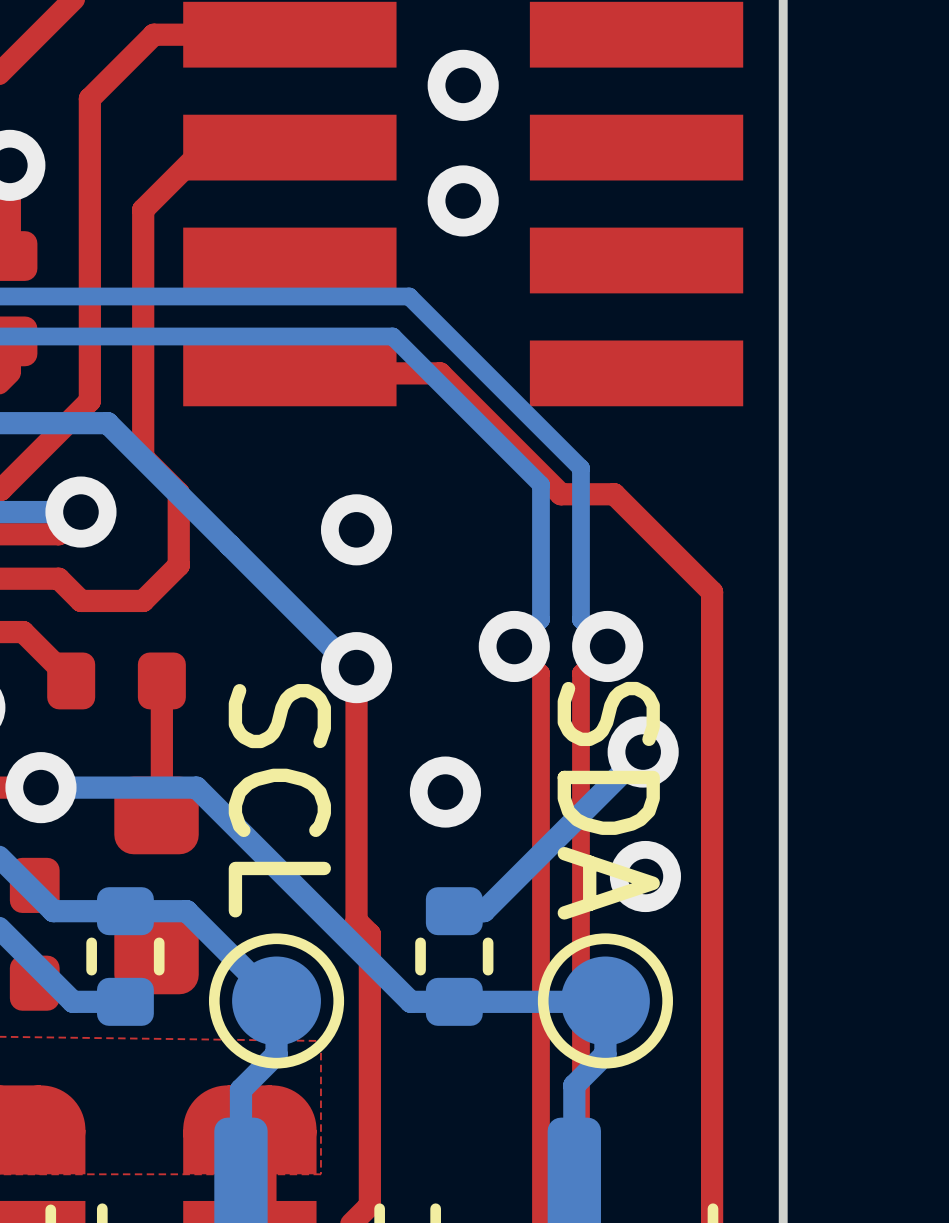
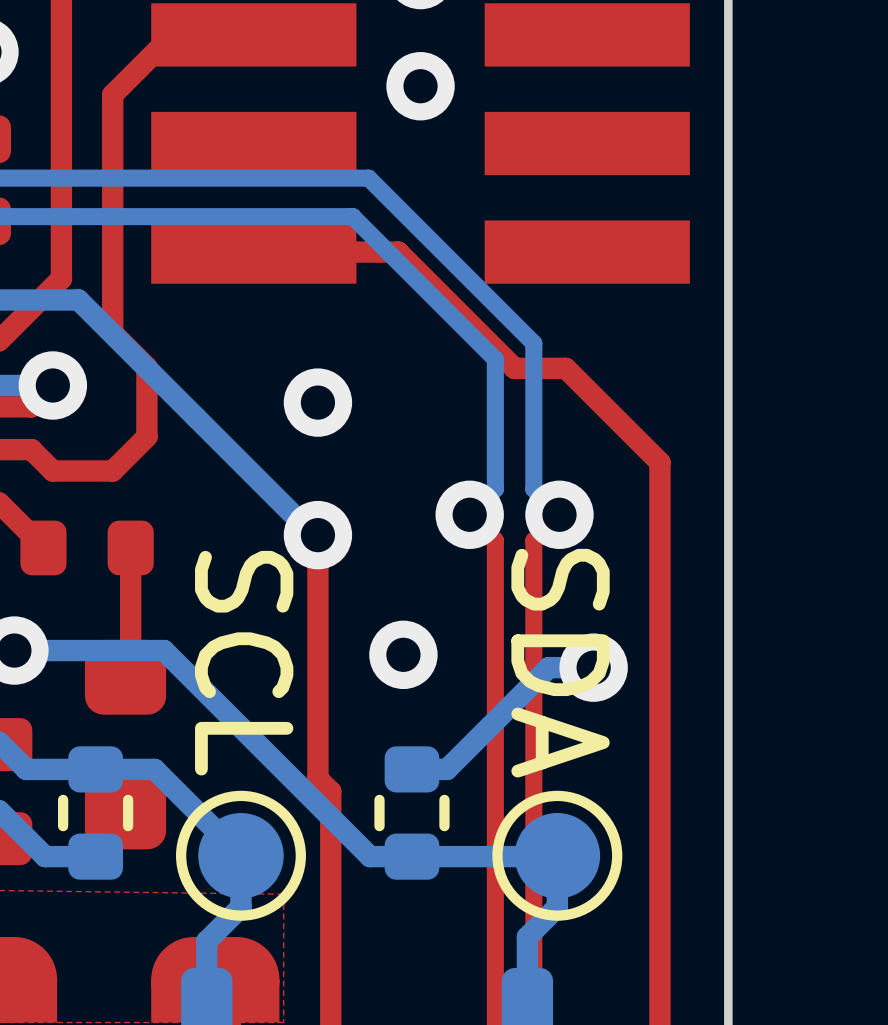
bottom track: (643, 752) (484, 911) -> (593, 667) (548, 667) (447, 769) (440, 769)
via: (643, 752) -> none
via: none -> (593, 667)
via: (645, 876) -> none

